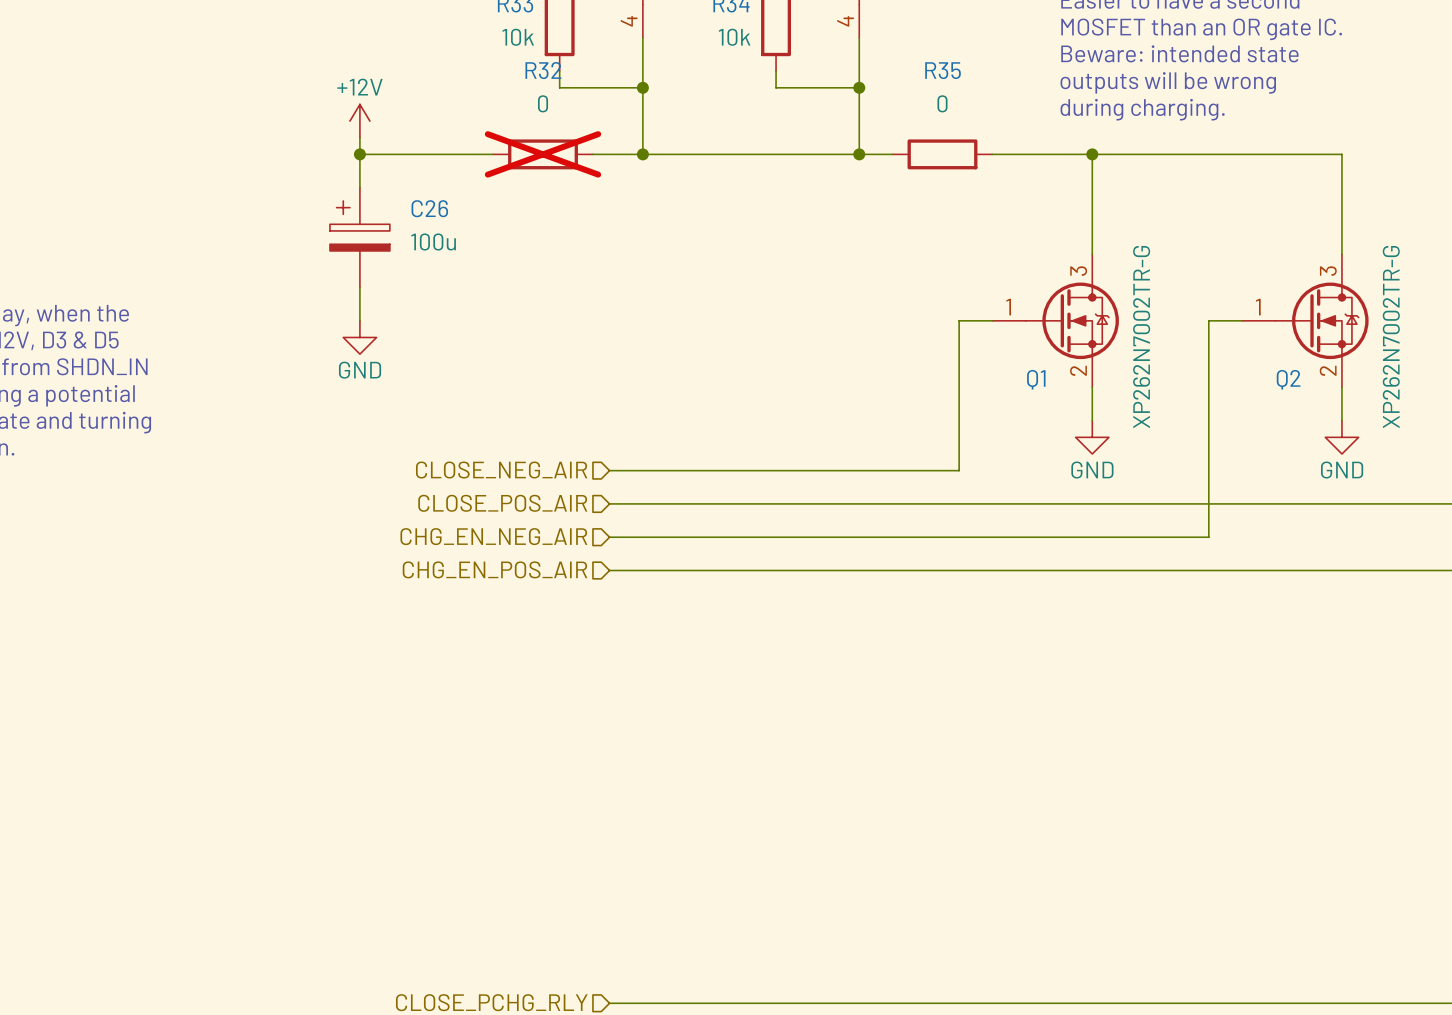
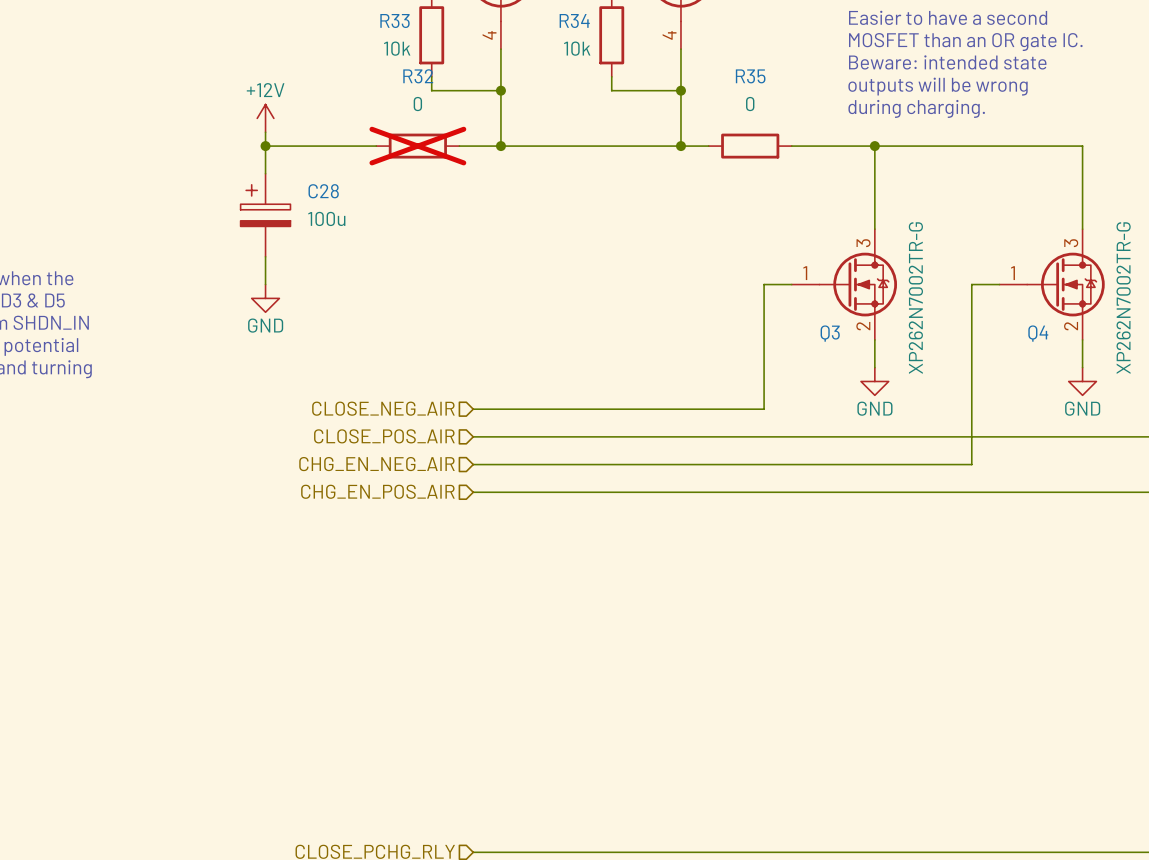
C26 name: C26 (429, 208) -> C28 (323, 191)
Q1 name: Q1 (1036, 379) -> Q3 (830, 333)
Q2 name: Q2 (1288, 379) -> Q4 (1038, 333)

